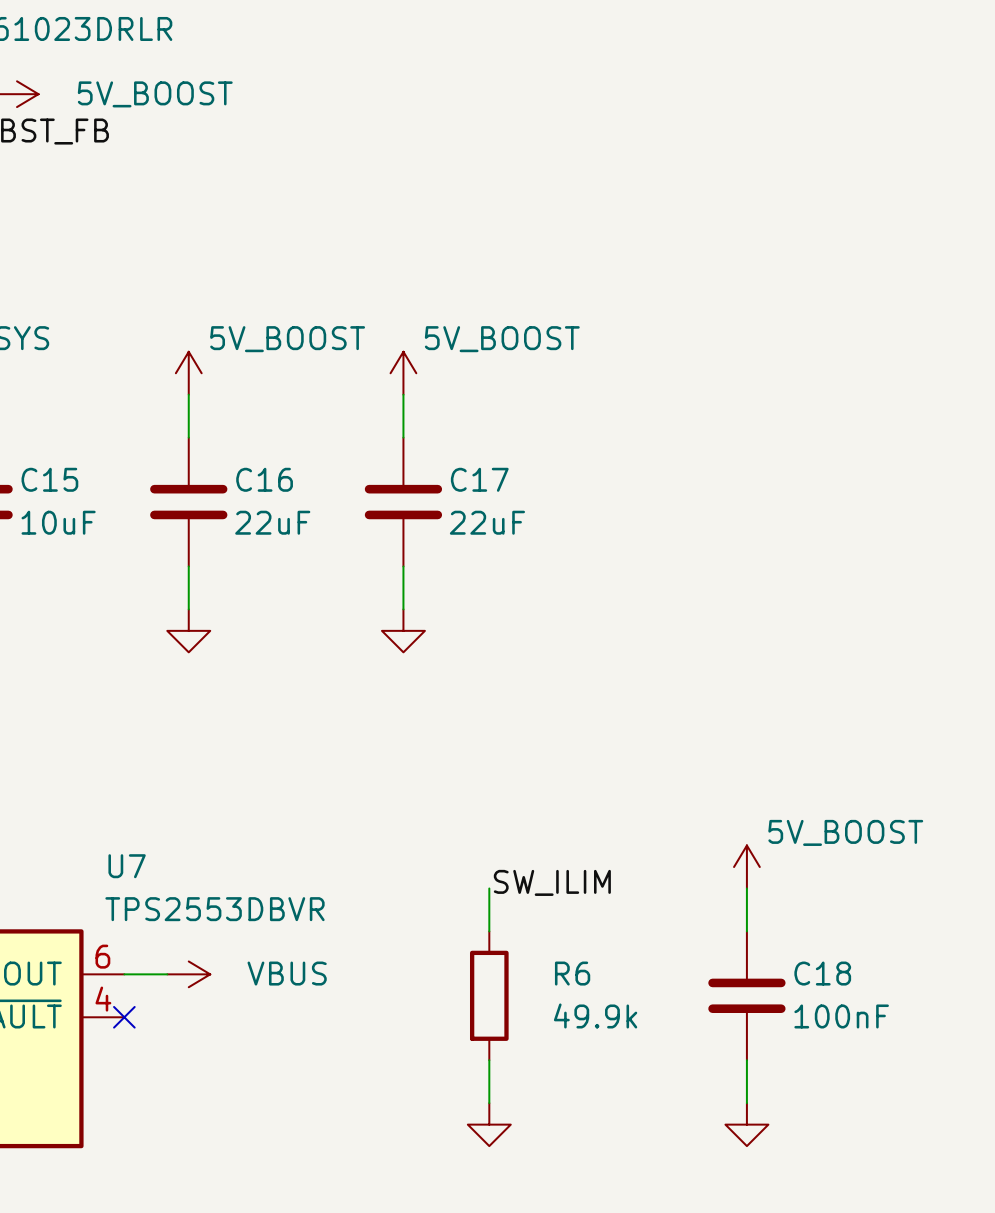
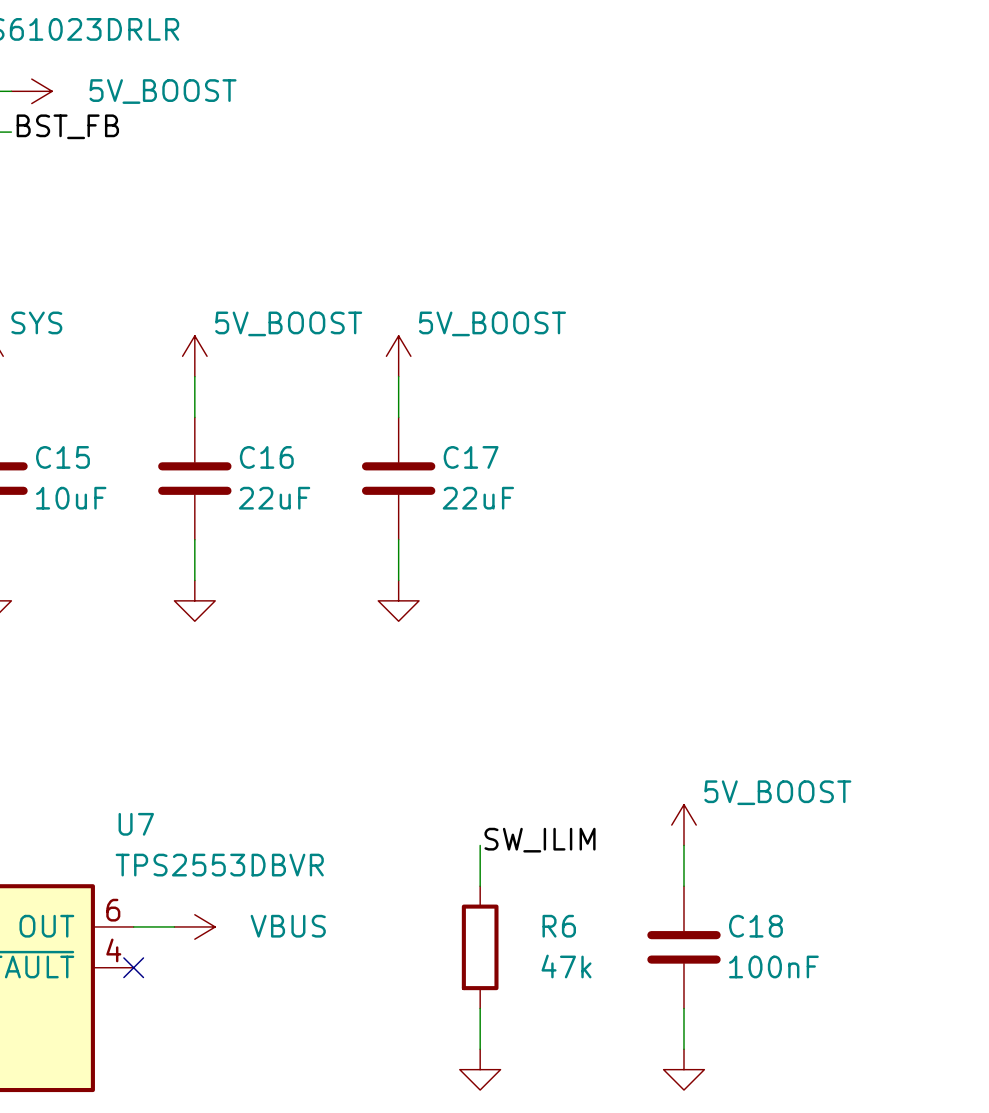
power symbol position: 5V_BOOST (746, 867) -> 5V_BOOST (683, 825)
wire: (746, 888) (746, 931) -> (683, 845) (683, 886)
C18 position: (746, 995) -> (683, 947)
R6 value: 49.9k (595, 1015) -> 47k (566, 966)
wire: (746, 1060) (746, 1103) -> (683, 1008) (683, 1049)
power symbol position: (746, 1124) -> (683, 1069)

